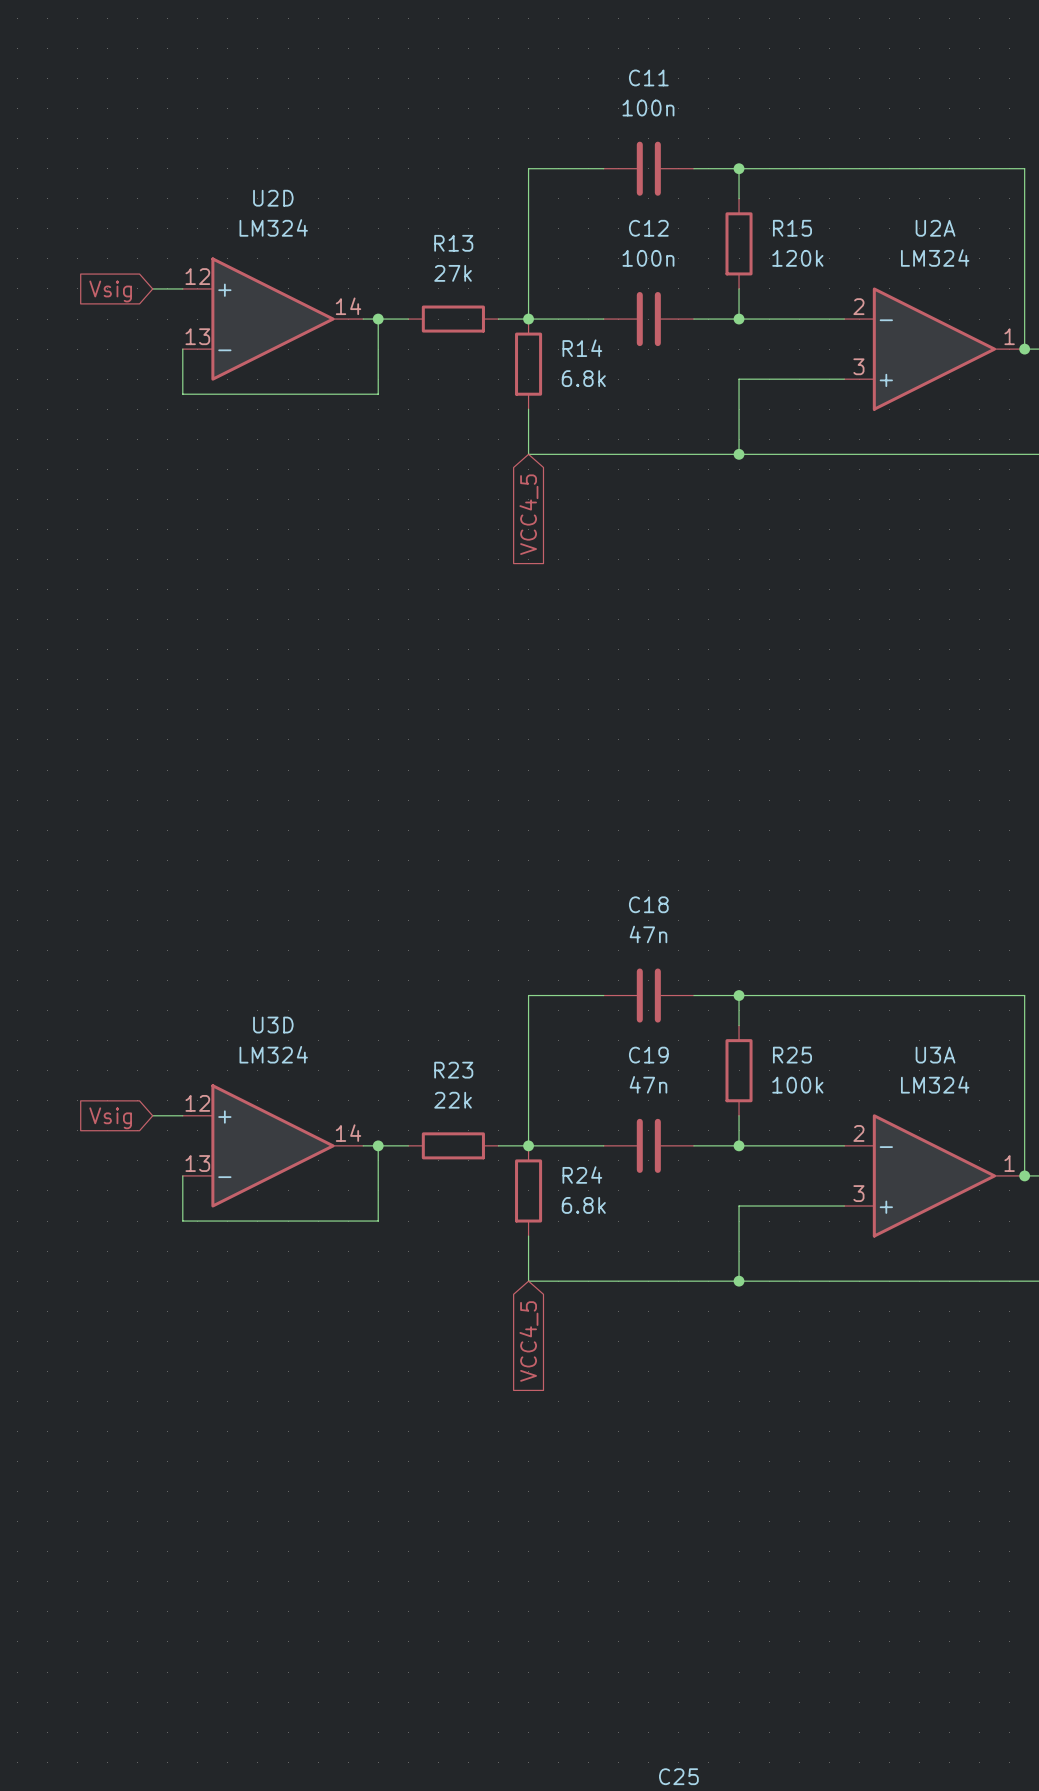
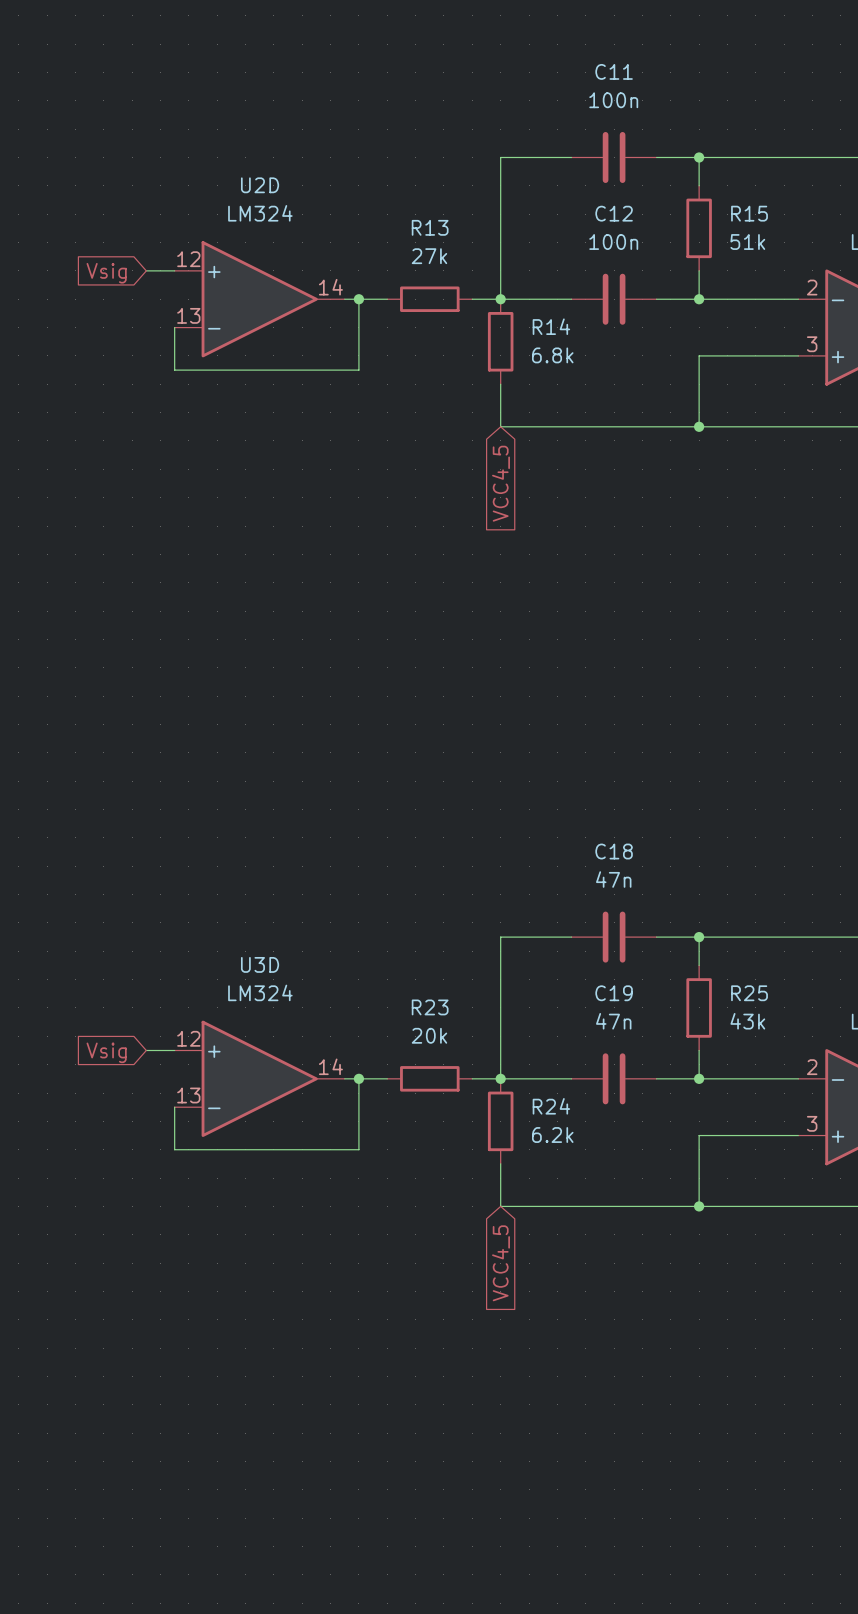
R15 value: 120k (797, 258) -> 51k (747, 242)
R25 value: 100k (797, 1085) -> 43k (747, 1021)
R23 value: 22k (453, 1100) -> 20k (429, 1035)
R24 value: 6.8k (583, 1205) -> 6.2k (552, 1135)

